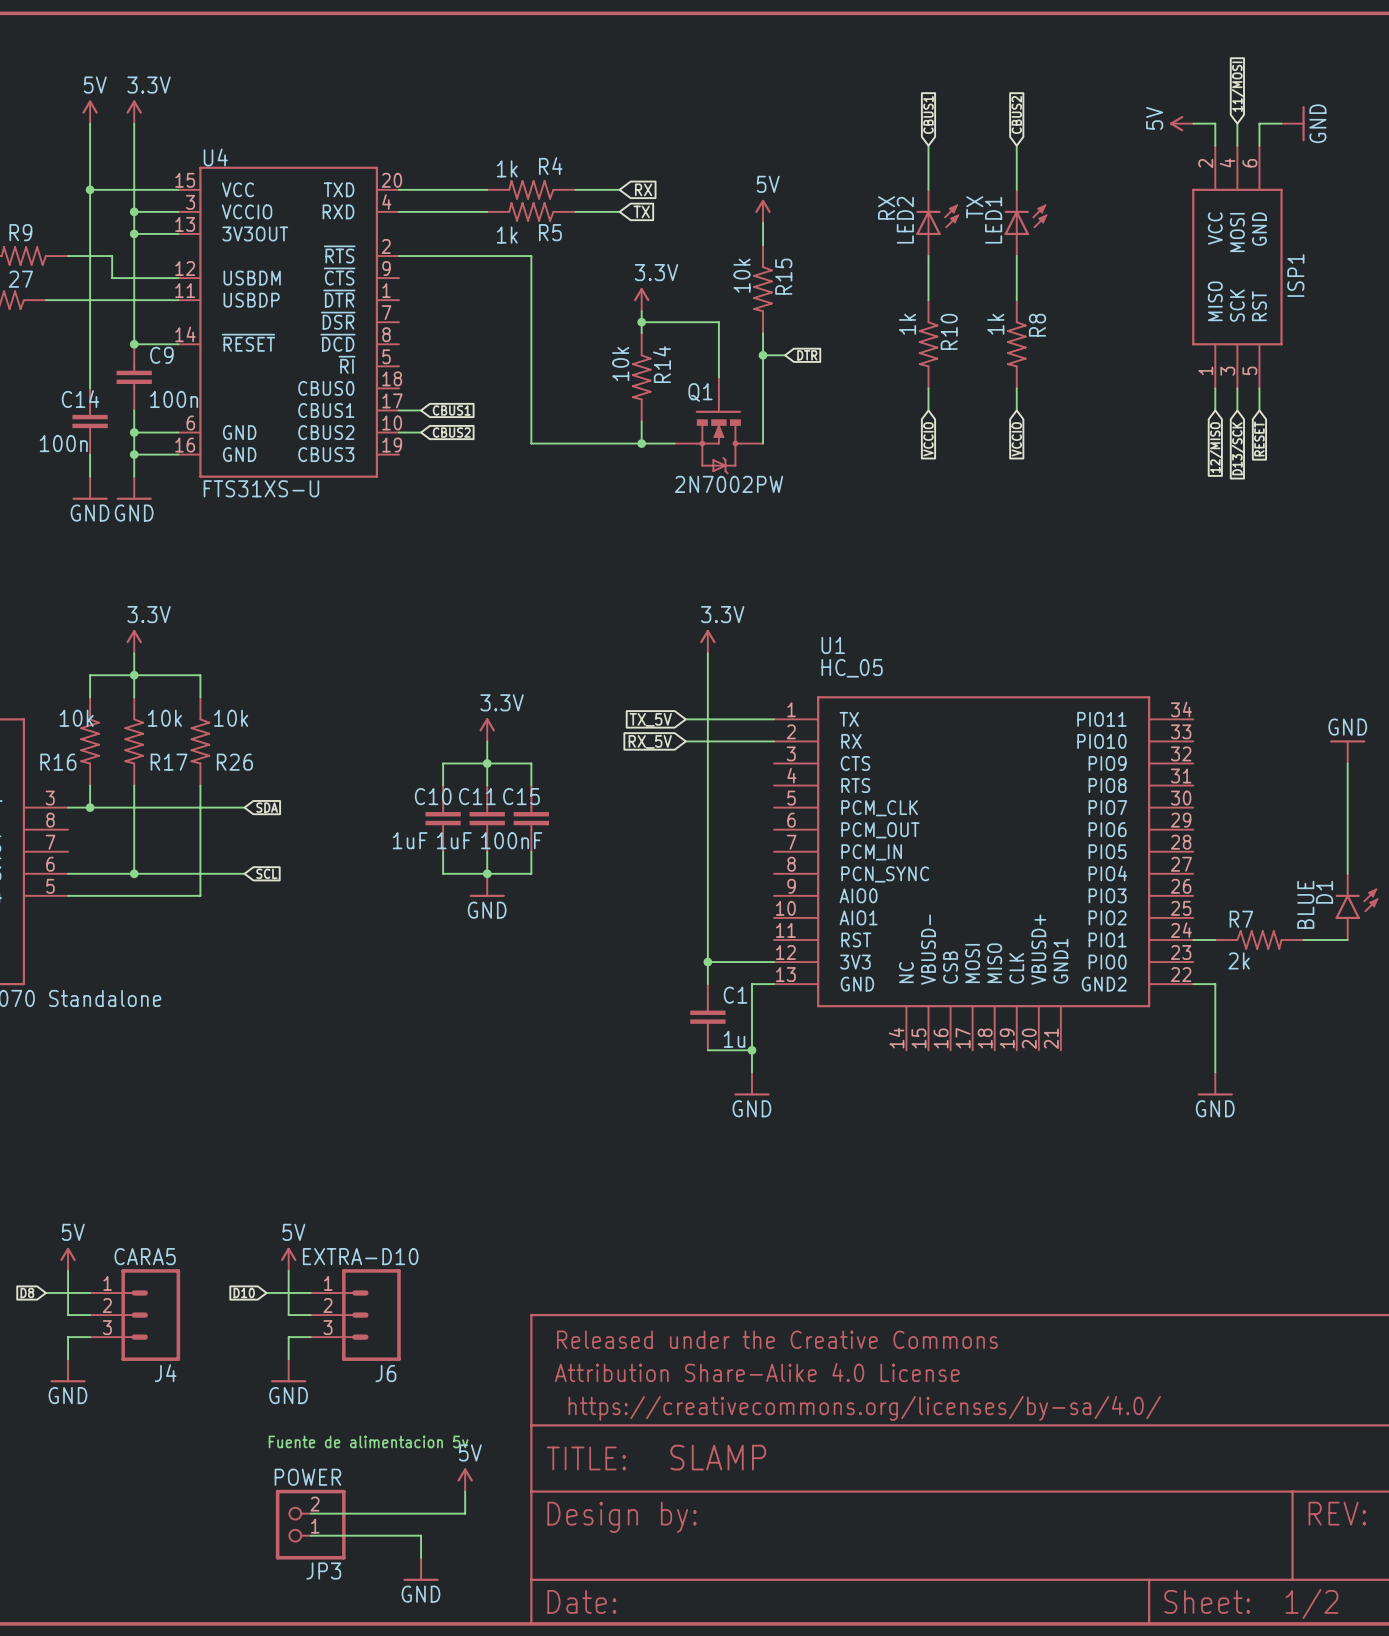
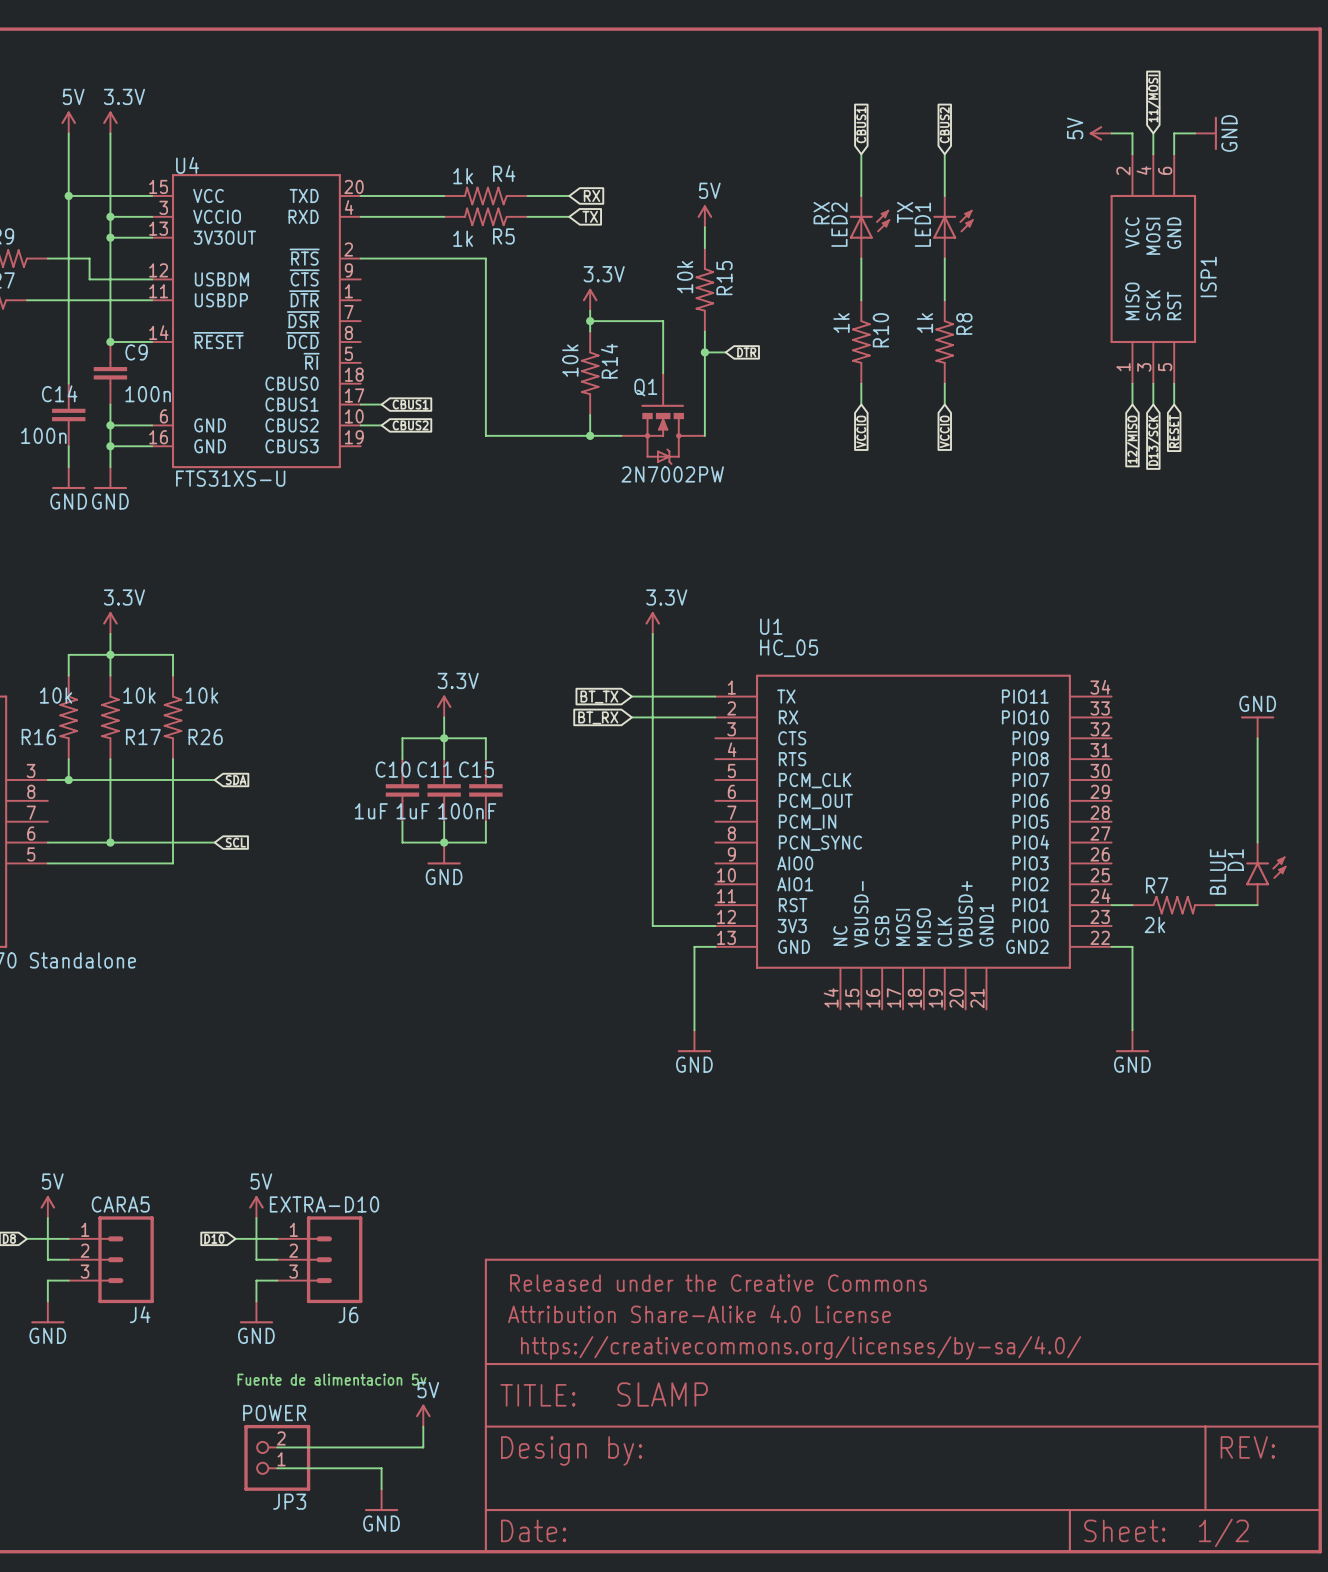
global label: TX_5V (650, 719) -> BT_TX (599, 697)
global label: RX_5V (650, 741) -> BT_RX (598, 717)
wire: (707, 962) (707, 984) -> none
junction: (707, 962) -> none
C1: 1u (707, 1017) -> none
wire: (707, 1050) (751, 1050) -> none
junction: (751, 1050) -> none

